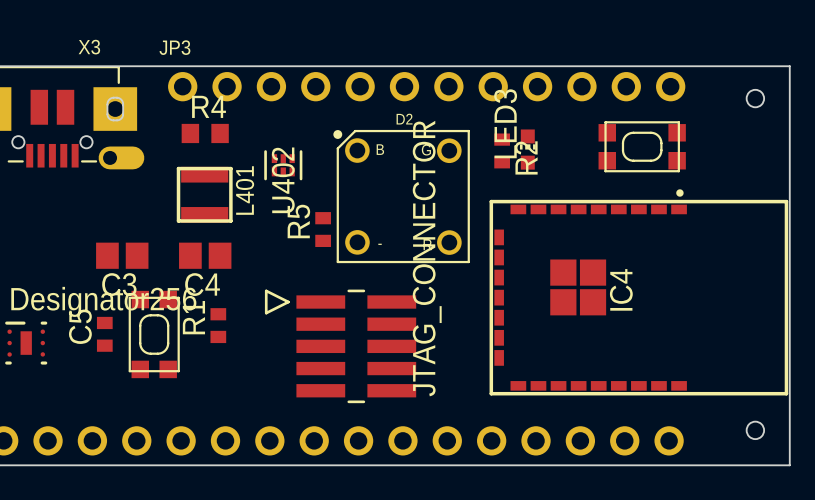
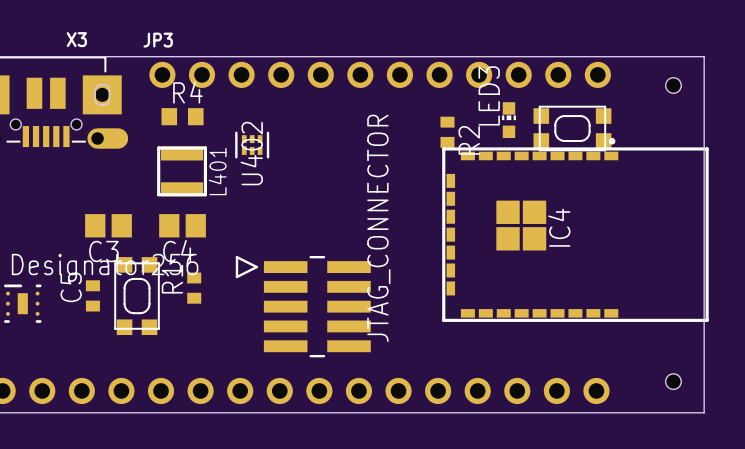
LED3 position: (527, 149) -> (508, 120)
D2: (401, 196) -> none
R5: (323, 229) -> none
IC4 position: (638, 292) -> (575, 229)

